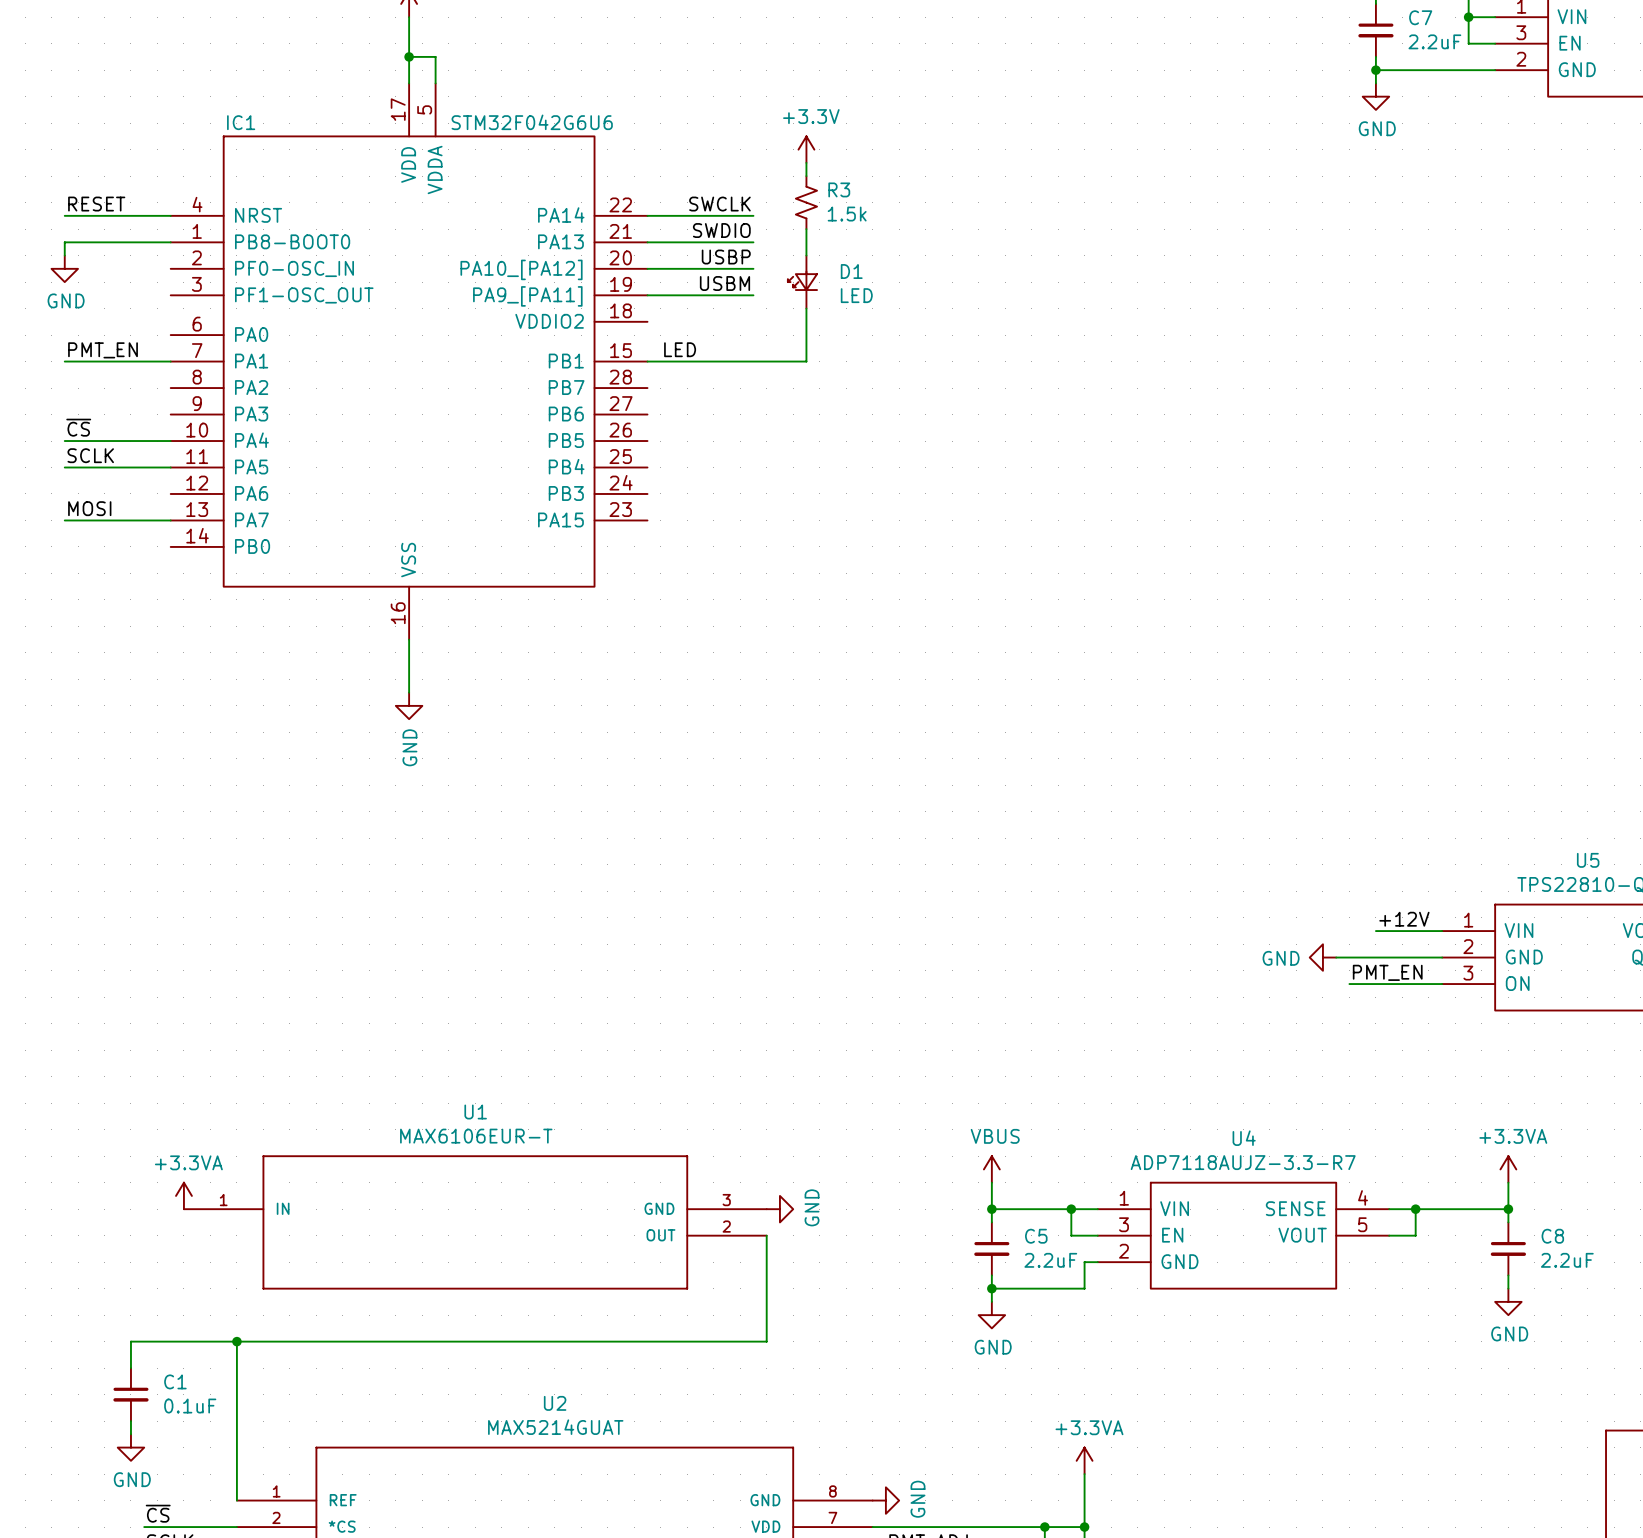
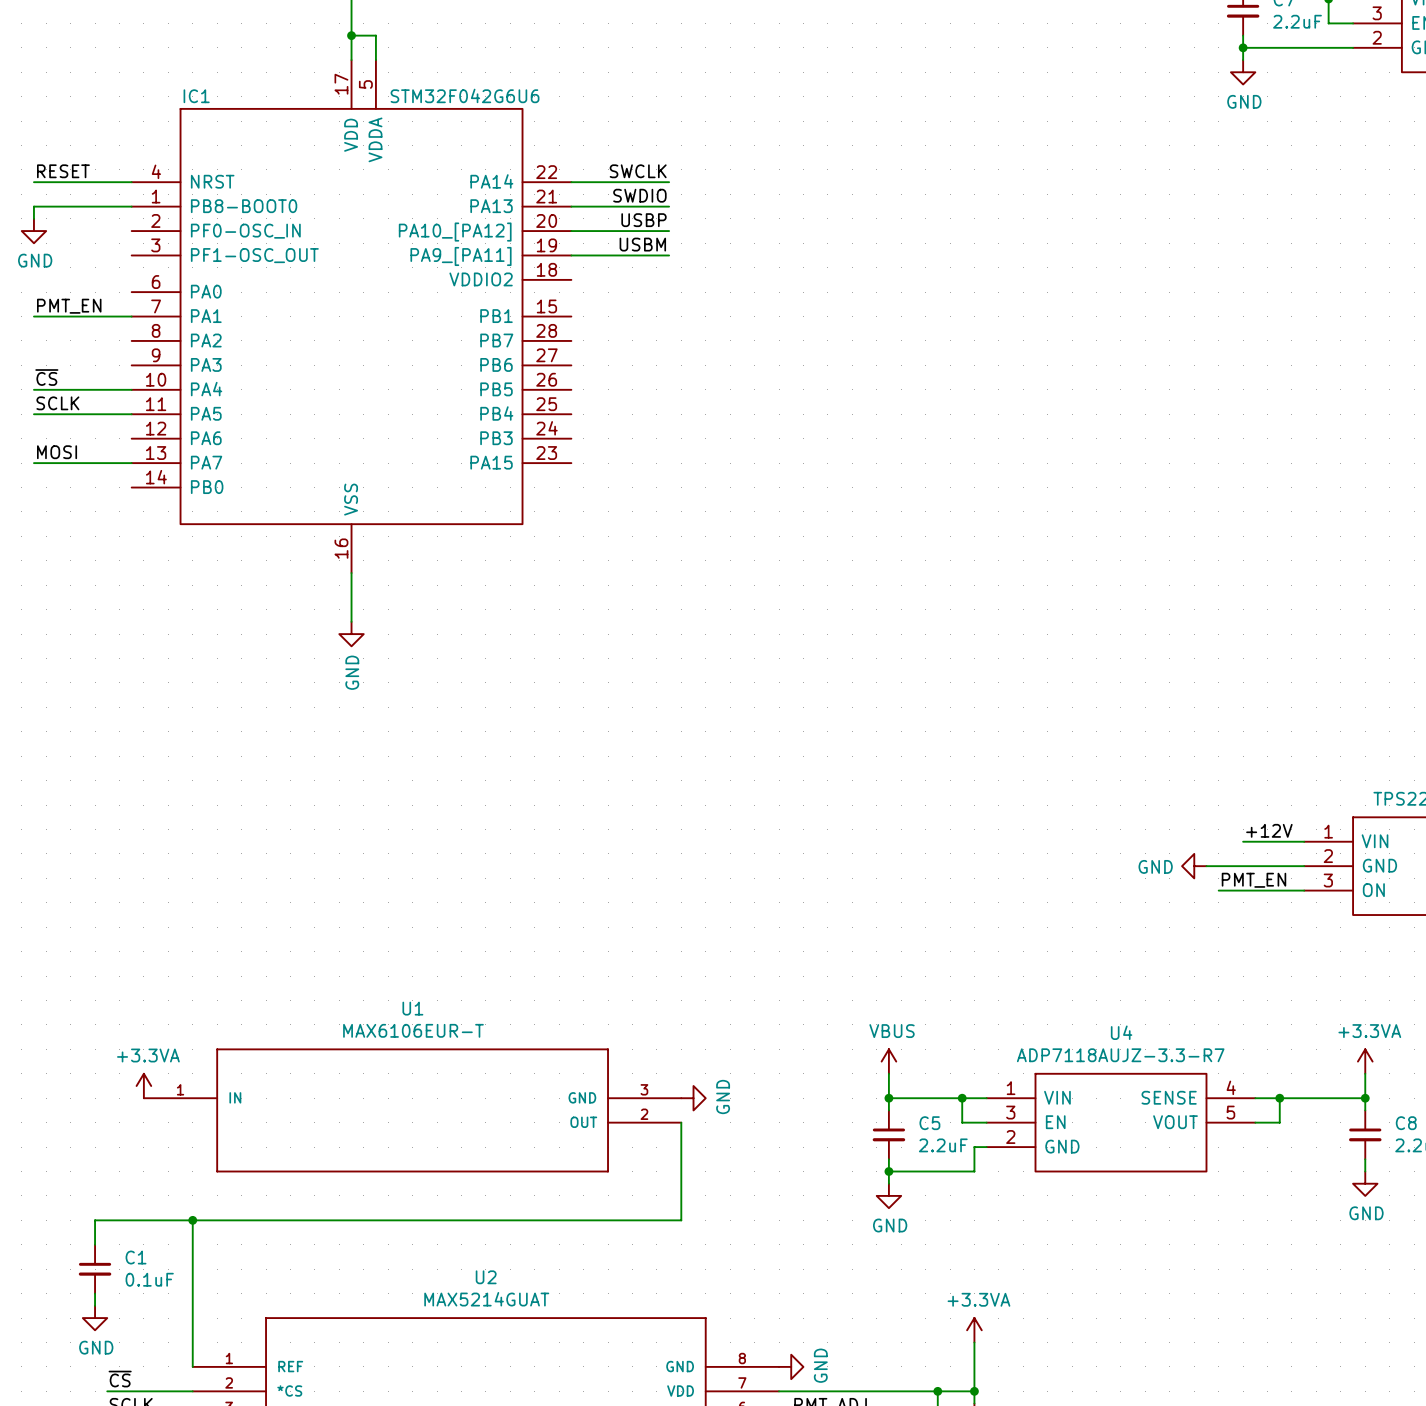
power symbol: +3.3V (806, 149) -> none
wire: (806, 162) (806, 176) -> none
R3: 1.5k (806, 202) -> none
wire: (806, 229) (806, 255) -> none
D1: LED (802, 282) -> none
wire: (806, 308) (806, 361) (647, 361) -> none
label: LED (680, 349) -> none

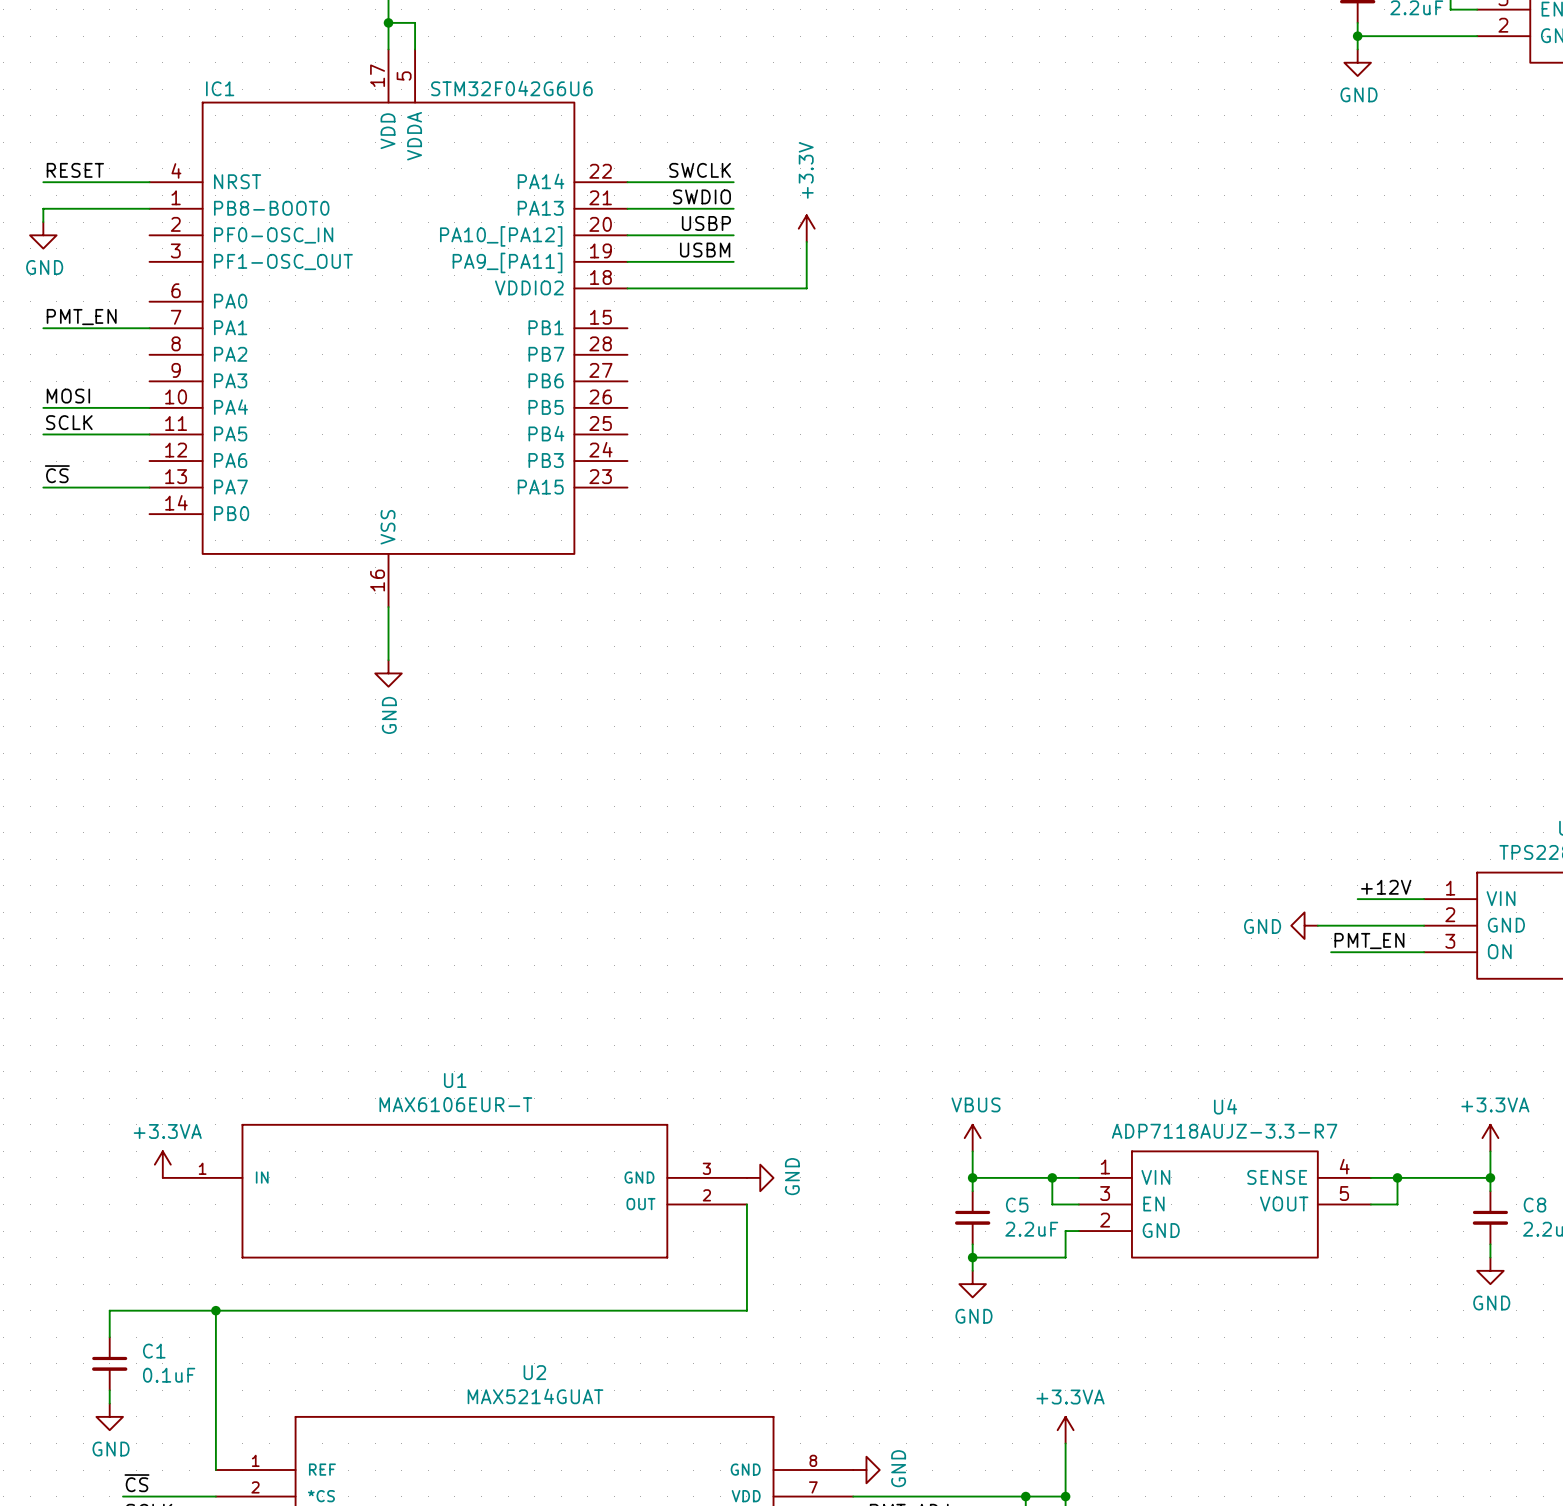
power symbol: none -> +3.3V (806, 228)
wire: none -> (806, 241) (806, 288) (627, 288)
label: ~{CS} (46, 377) -> MOSI (68, 396)
label: MOSI (57, 452) -> ~{CS} (57, 474)

